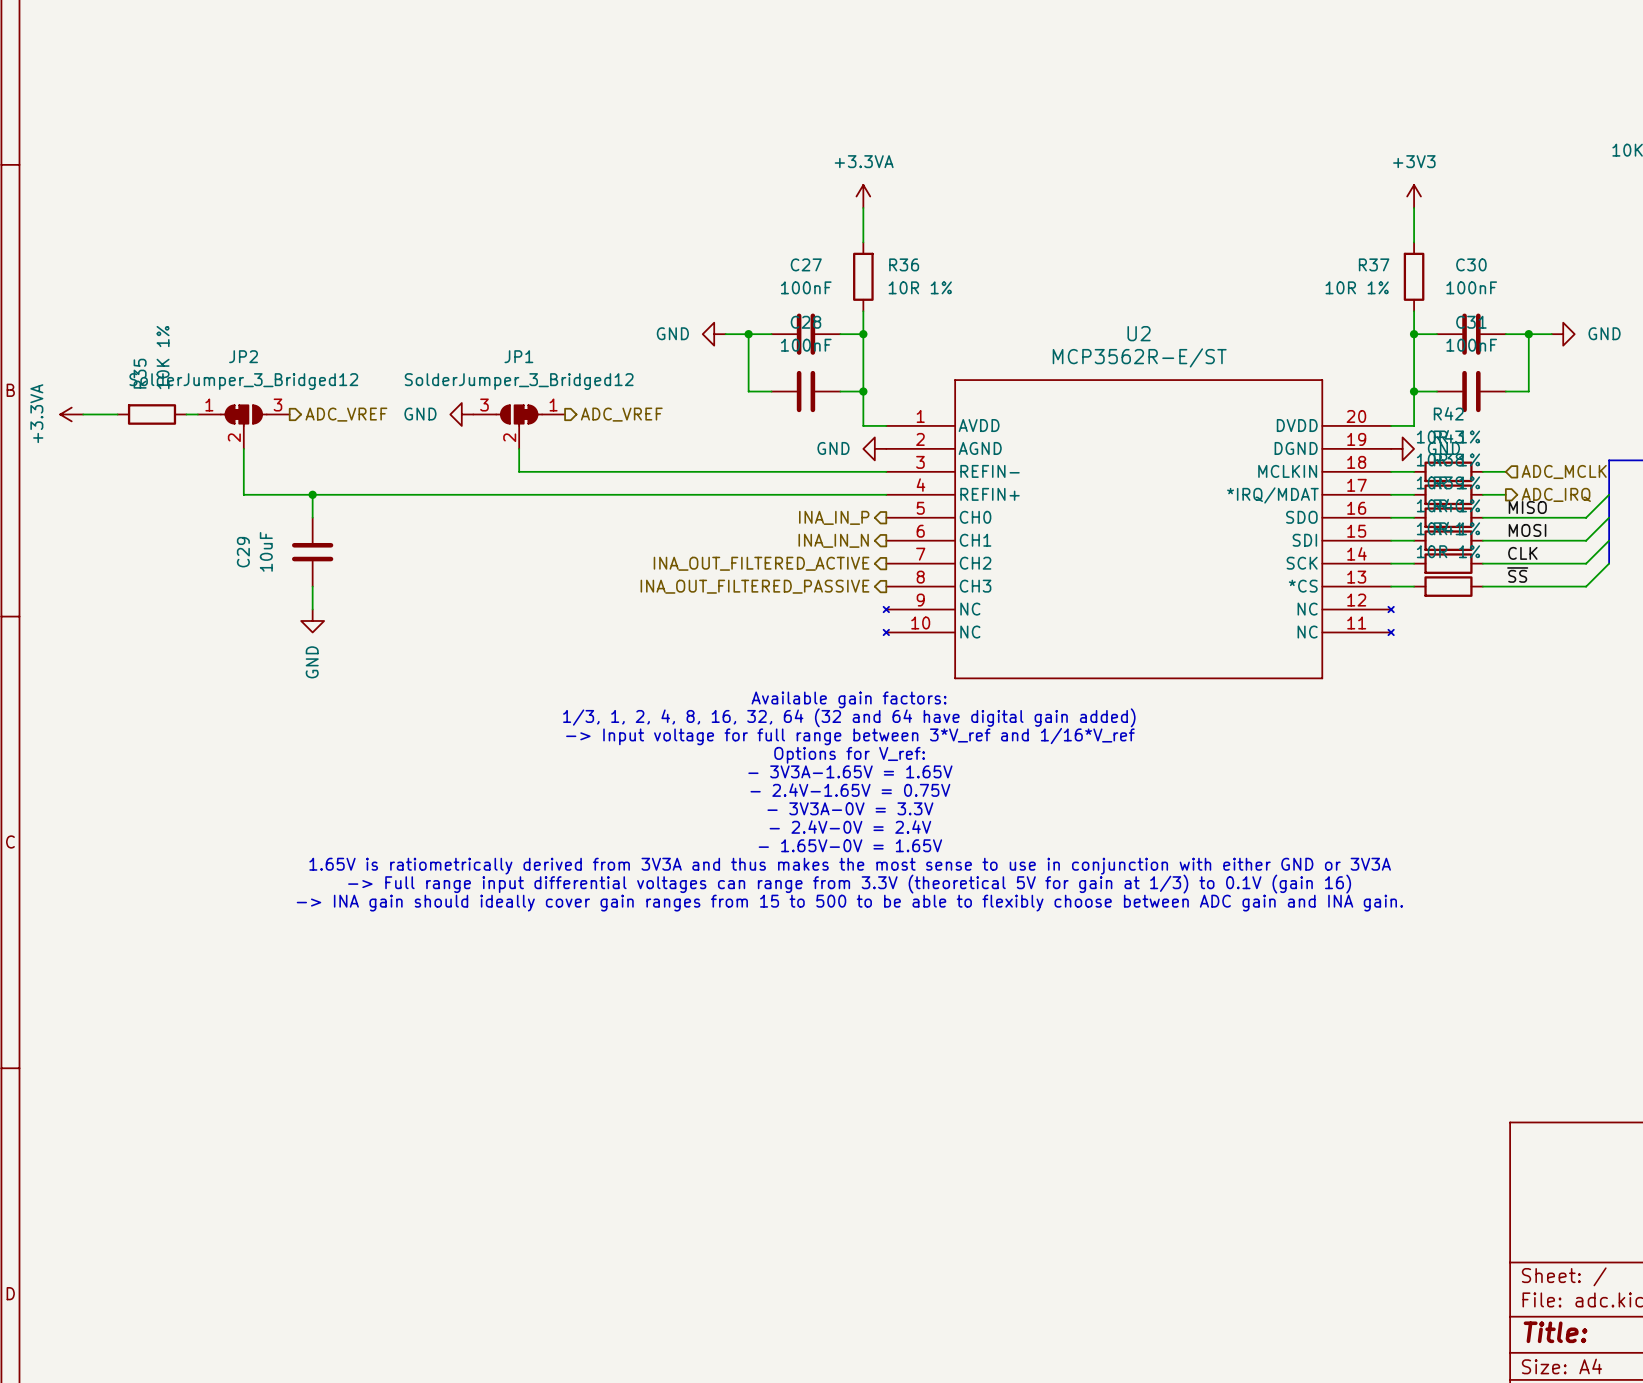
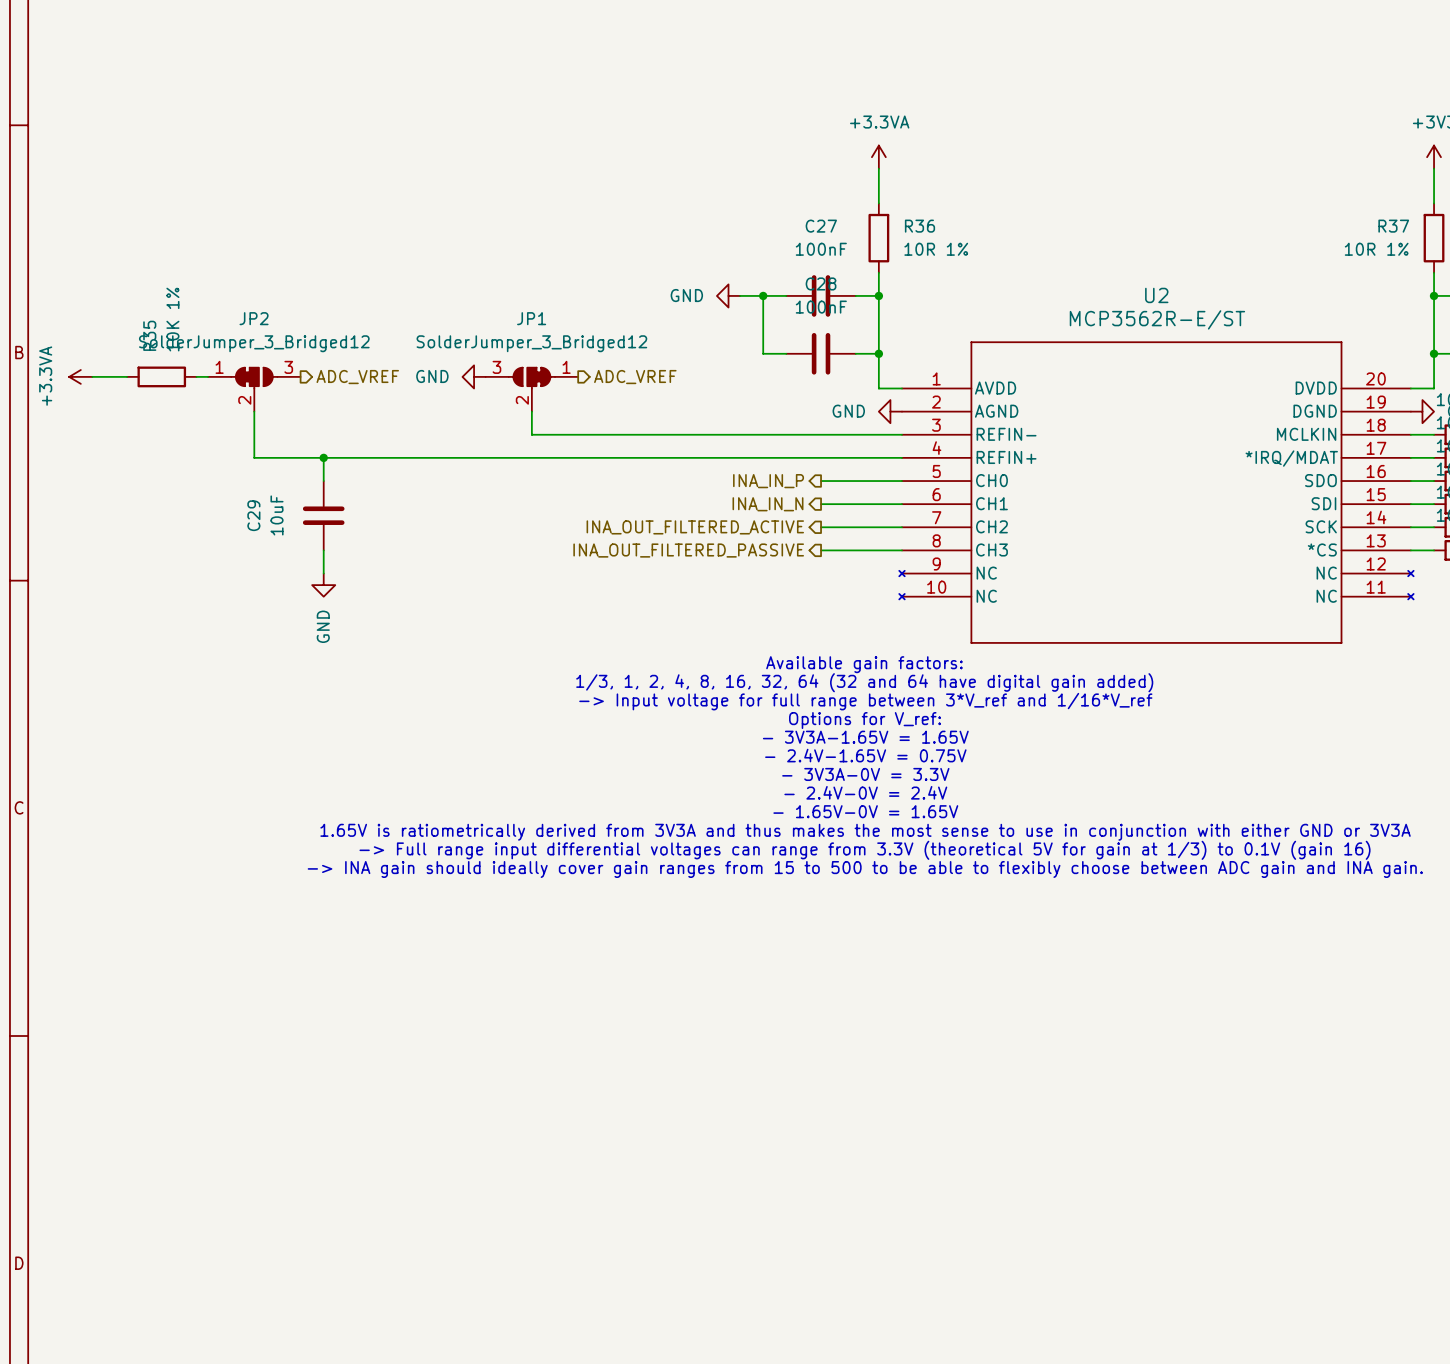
wire: none -> (821, 481) (902, 481)
hierarchical label position: INA_IN_P (834, 517) -> INA_IN_P (768, 481)
wire: none -> (821, 504) (902, 504)
hierarchical label position: INA_IN_N (833, 540) -> INA_IN_N (767, 504)
hierarchical label position: INA_OUT_FILTERED_ACTIVE (761, 563) -> INA_OUT_FILTERED_ACTIVE (695, 527)
wire: none -> (821, 527) (902, 527)
hierarchical label position: INA_OUT_FILTERED_PASSIVE (755, 586) -> INA_OUT_FILTERED_PASSIVE (688, 550)
wire: none -> (821, 550) (902, 550)

